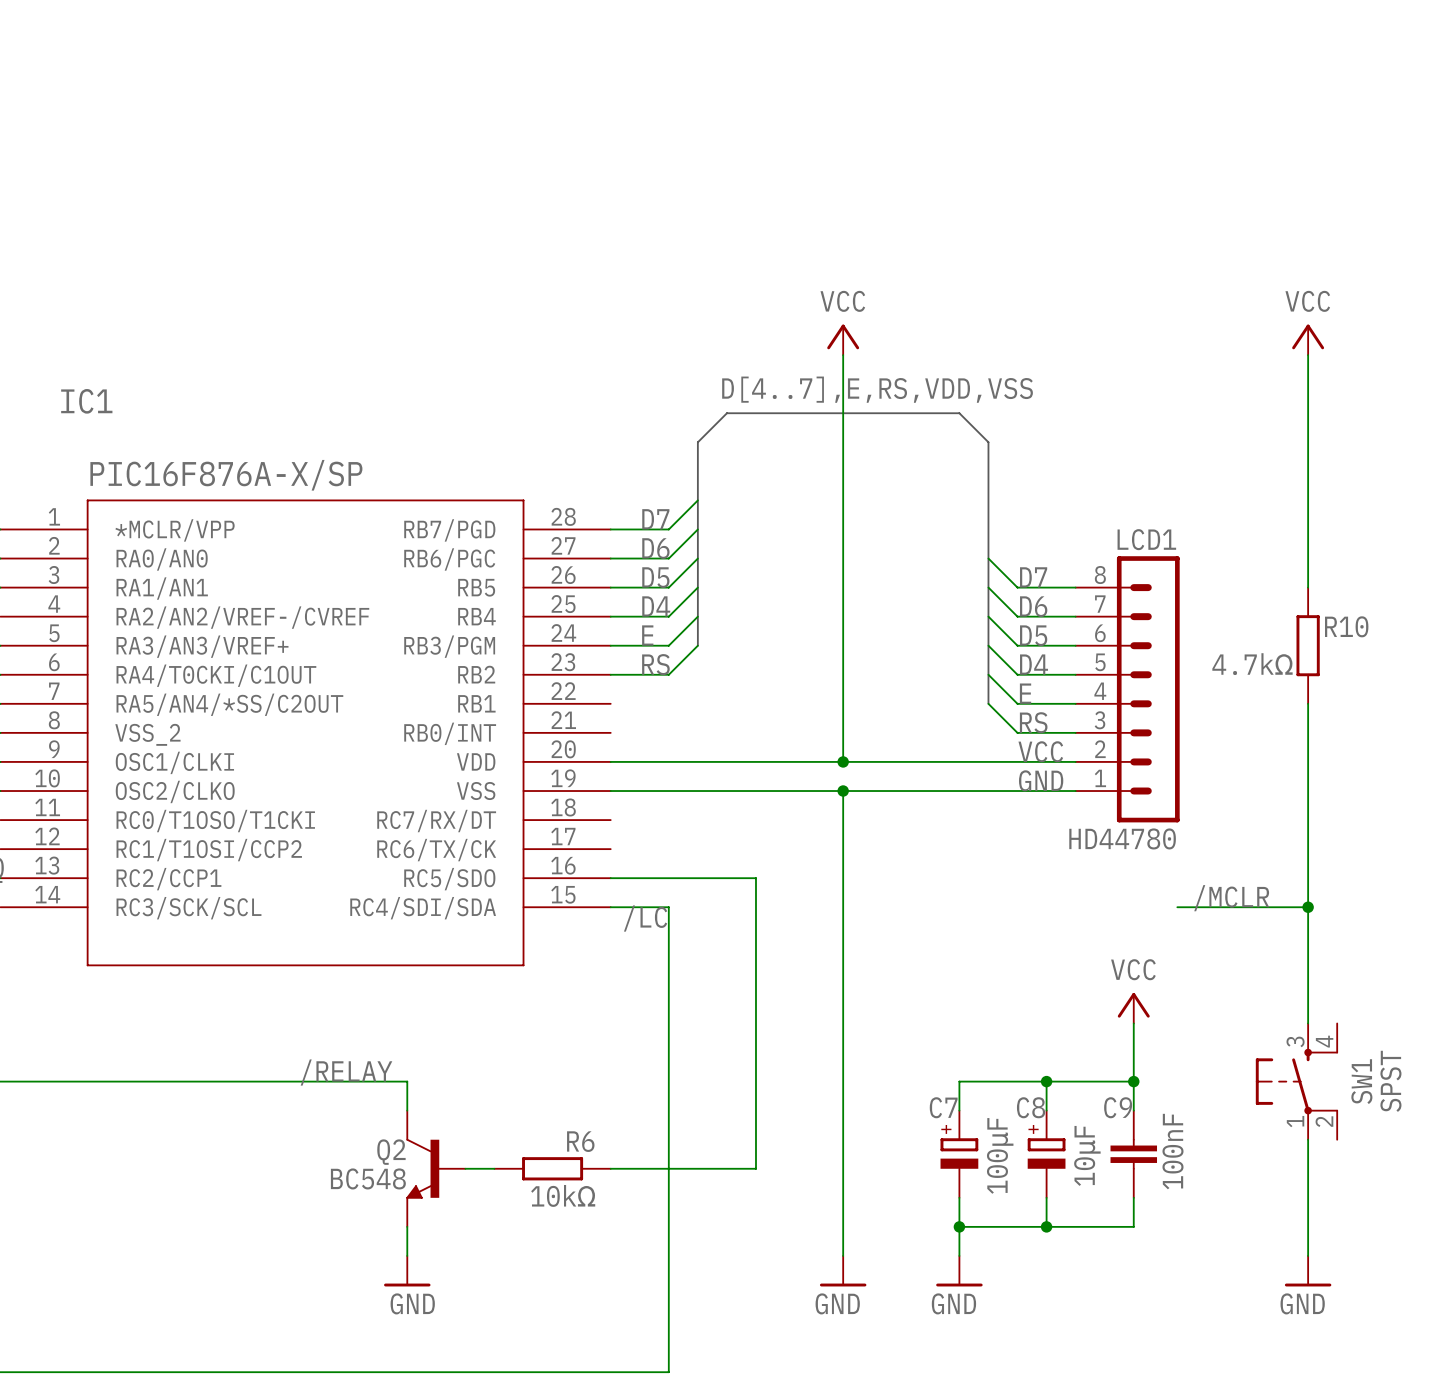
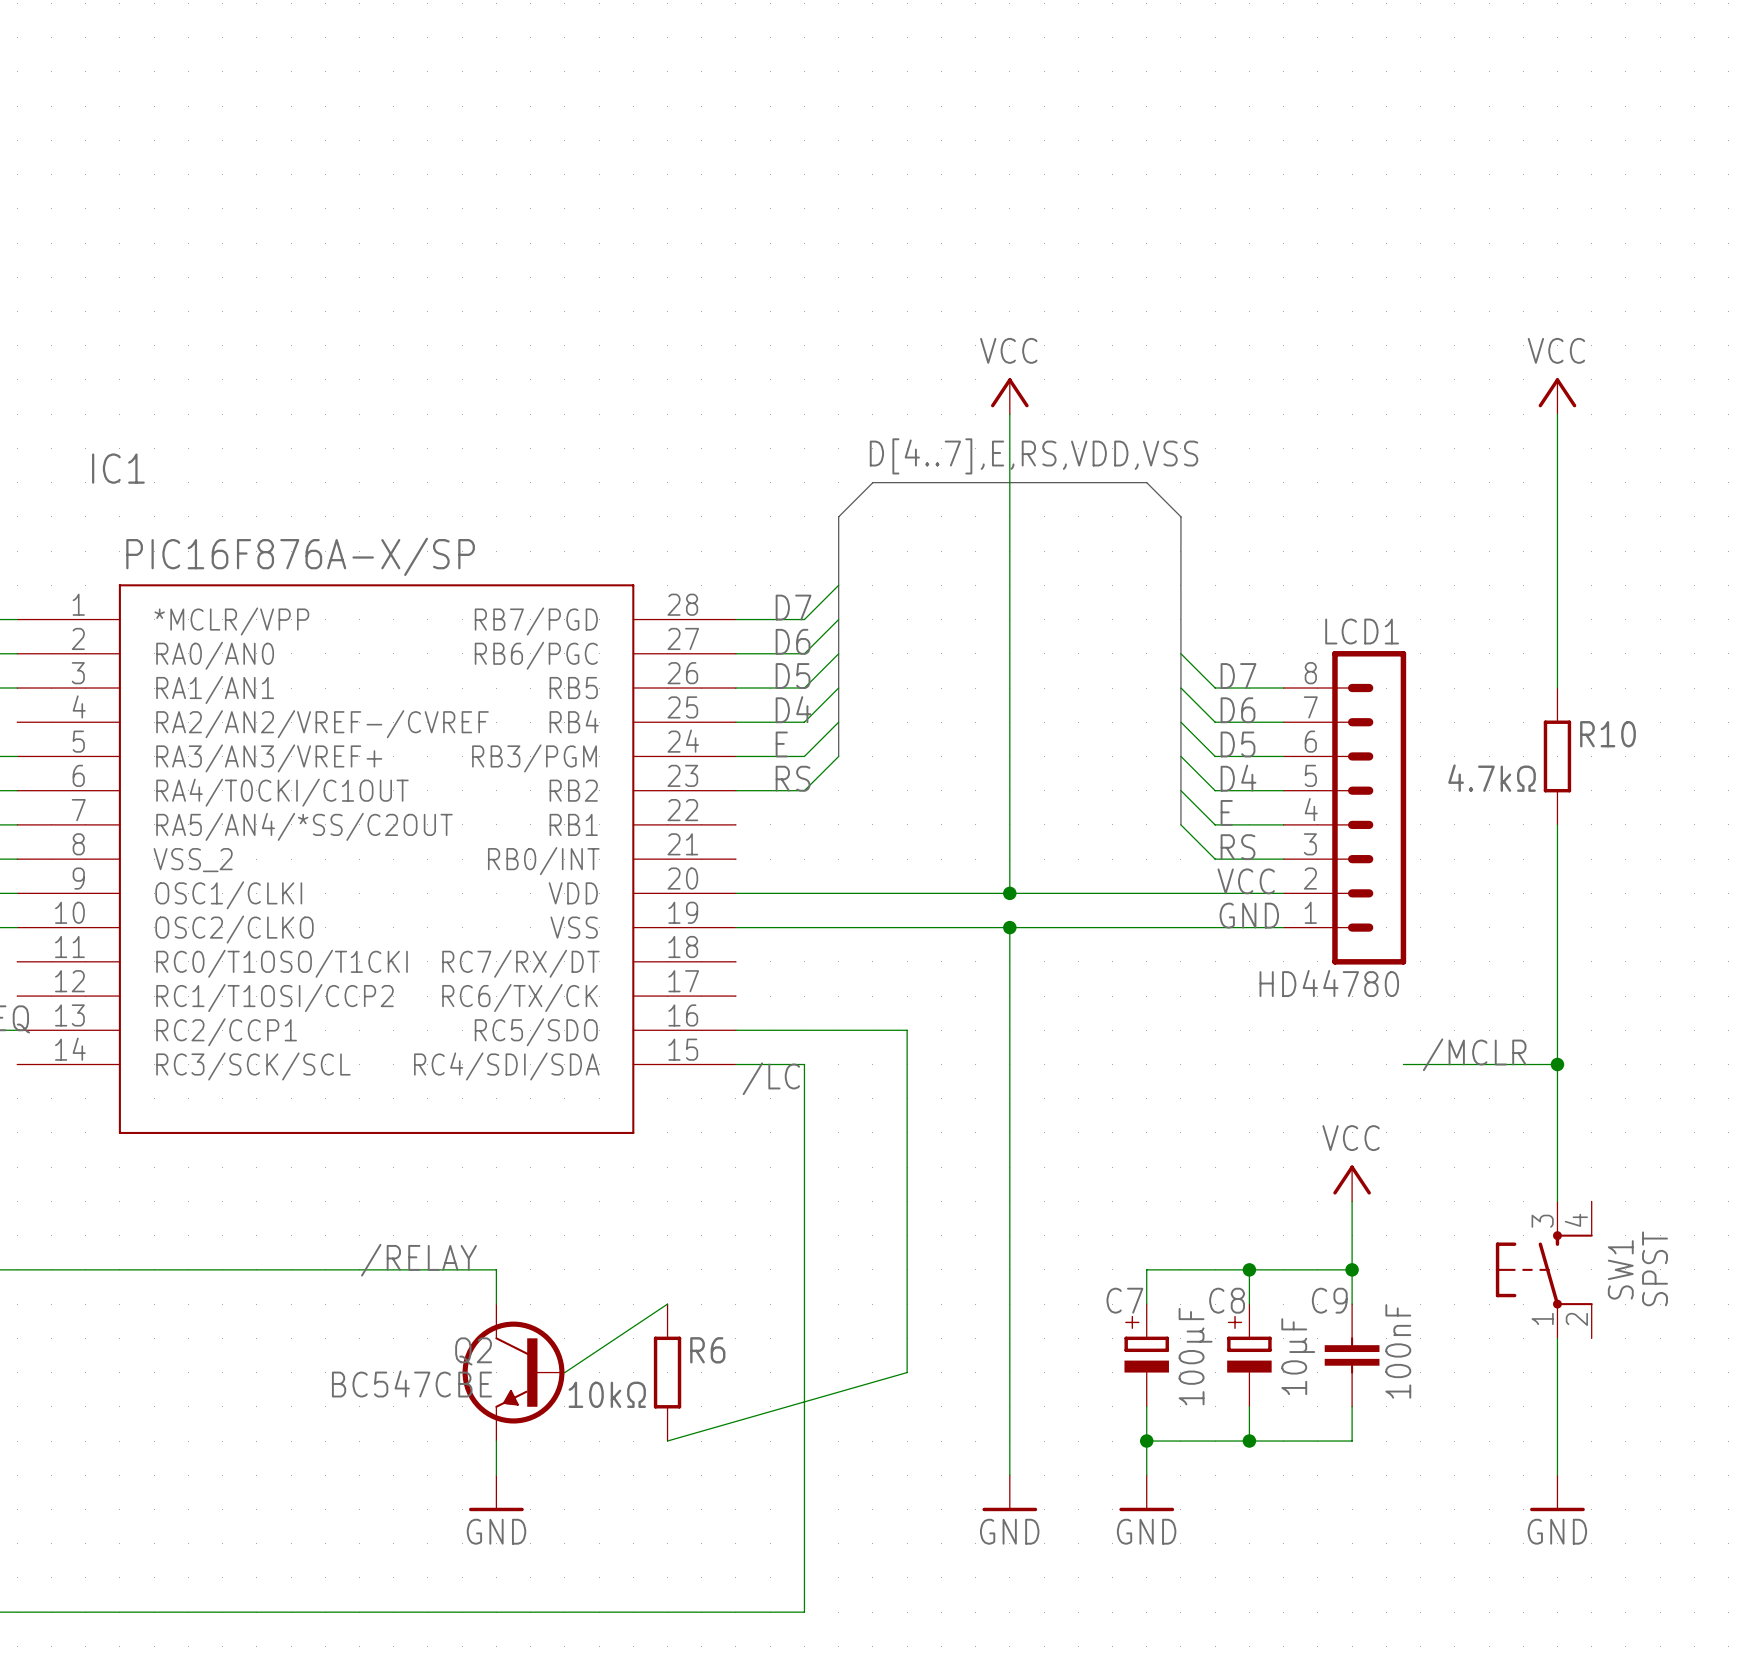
Q2 symbol: [406, 1110, 466, 1227] -> [462, 1304, 565, 1442]
wire: (465, 1168) (494, 1168) -> (564, 1372) (667, 1304)
R6 rotation: 0° (552, 1168) -> 90° clockwise (667, 1372)
wire: (610, 1168) (755, 1168) -> (667, 1441) (907, 1372)
Q2 value: BC548 (368, 1178) -> BC547CBE (411, 1383)
R6 value position: 10kΩ (563, 1195) -> 10kΩ (607, 1394)

